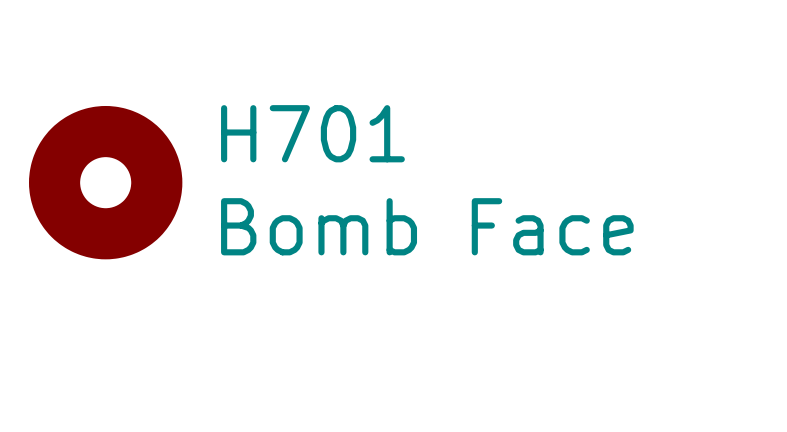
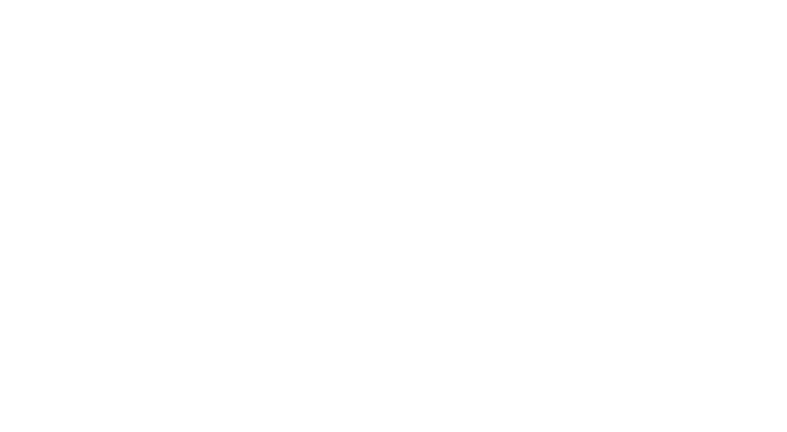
H701: Bomb Face (105, 182) -> none

